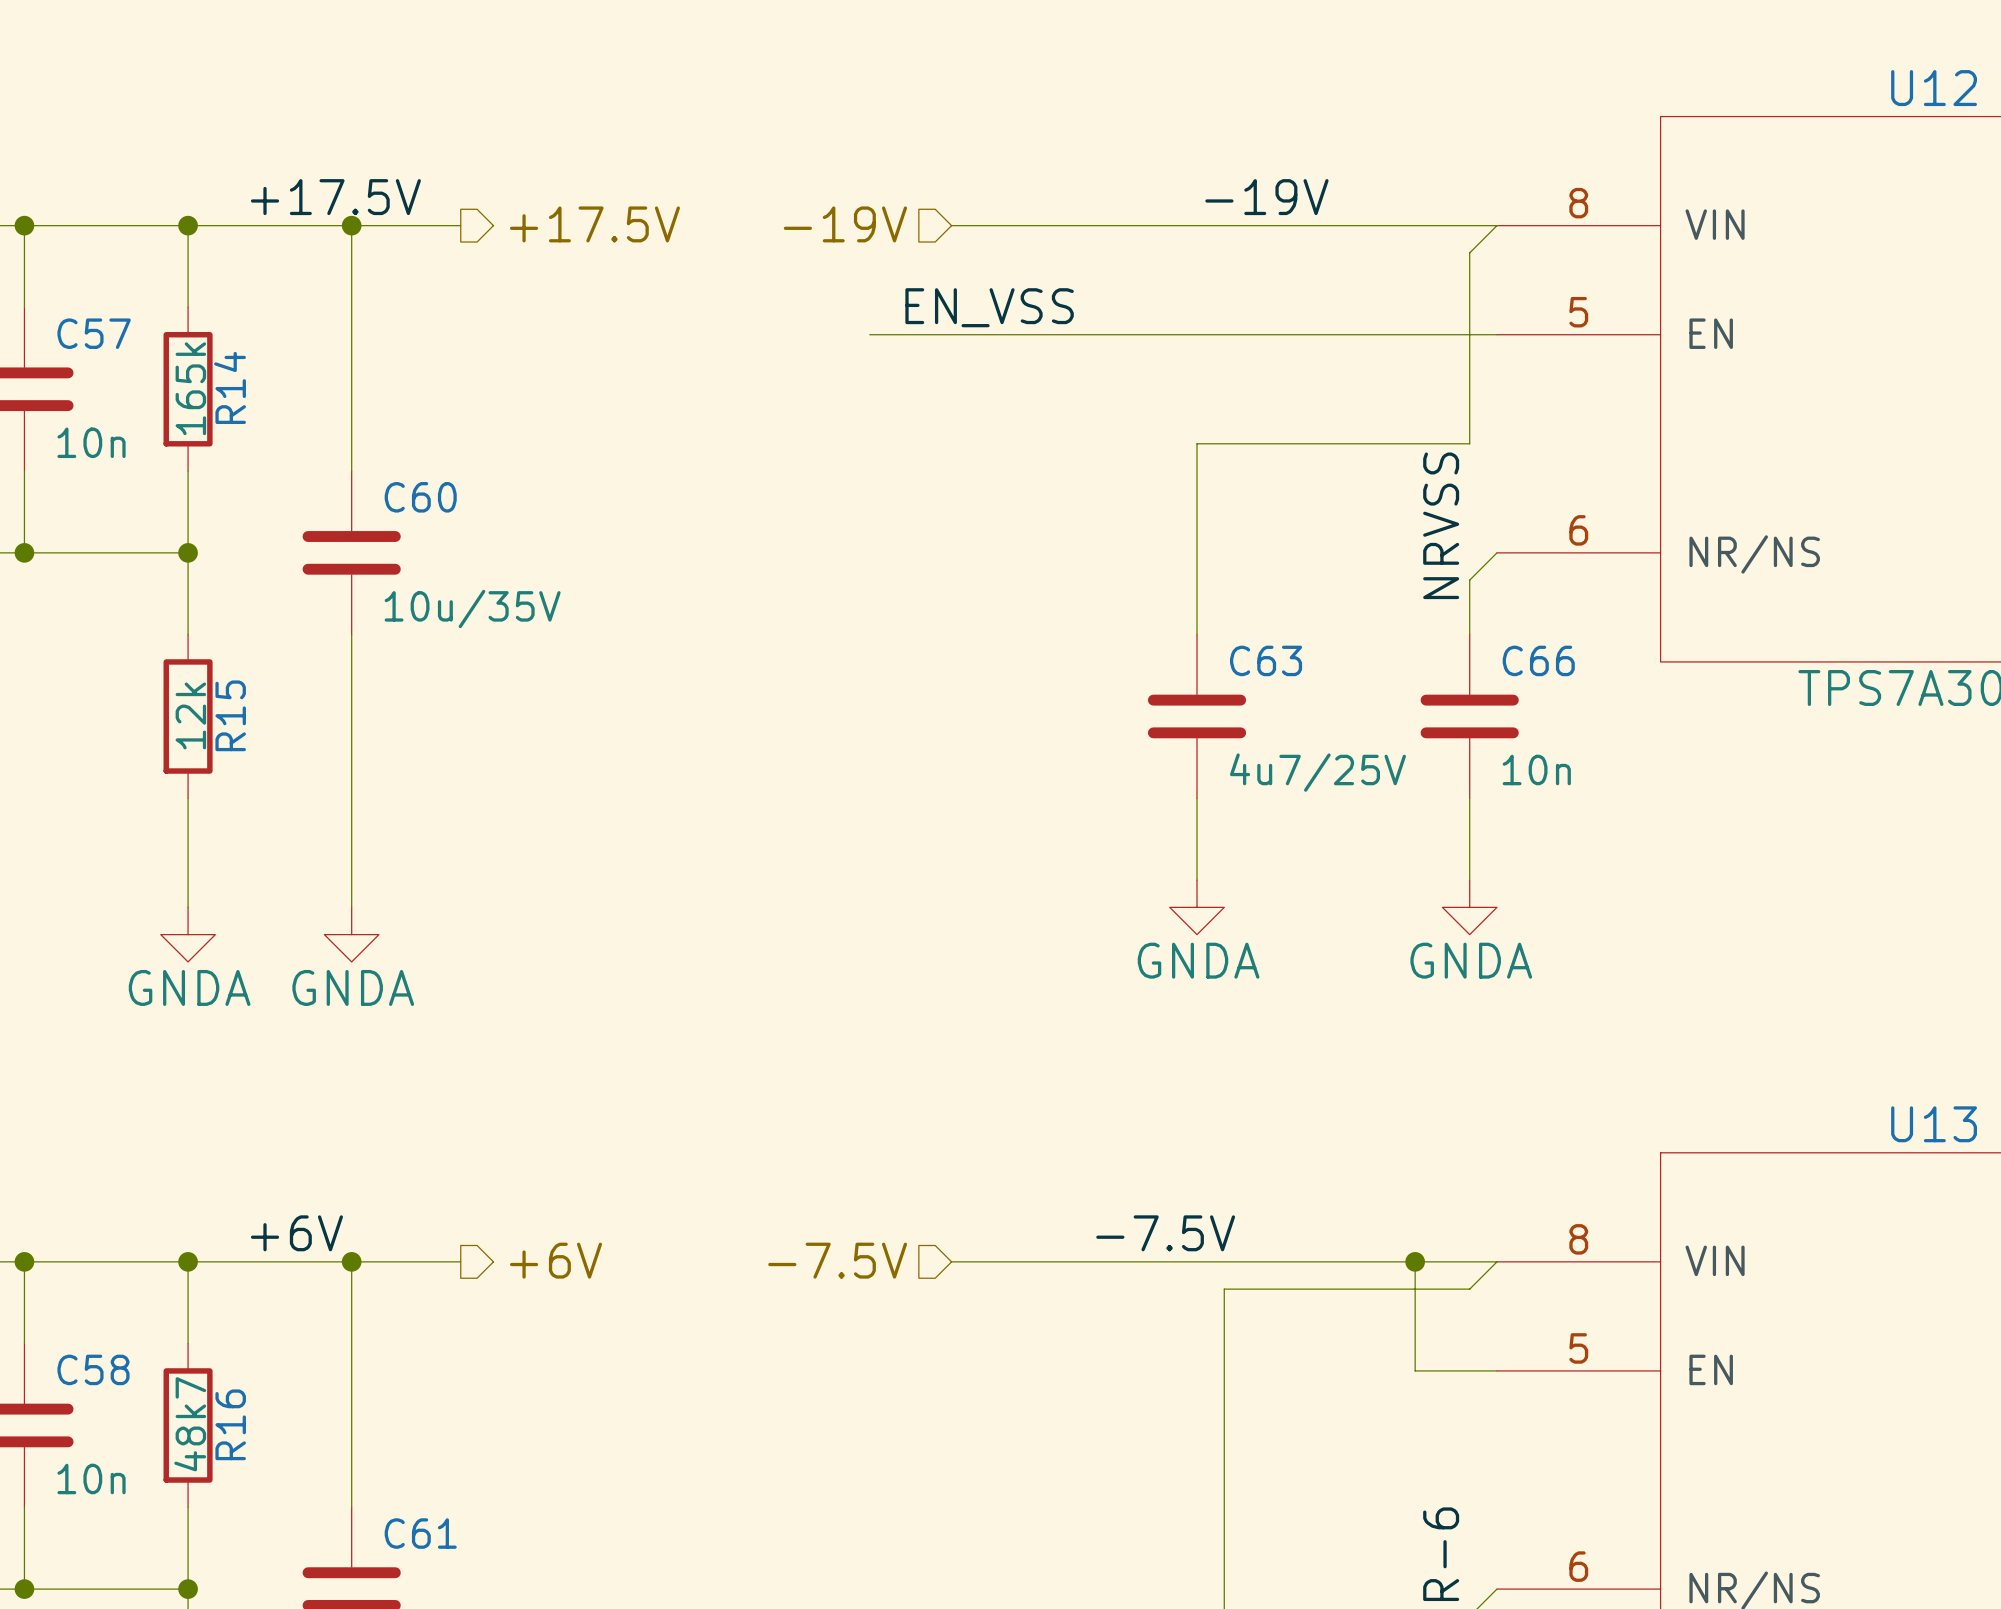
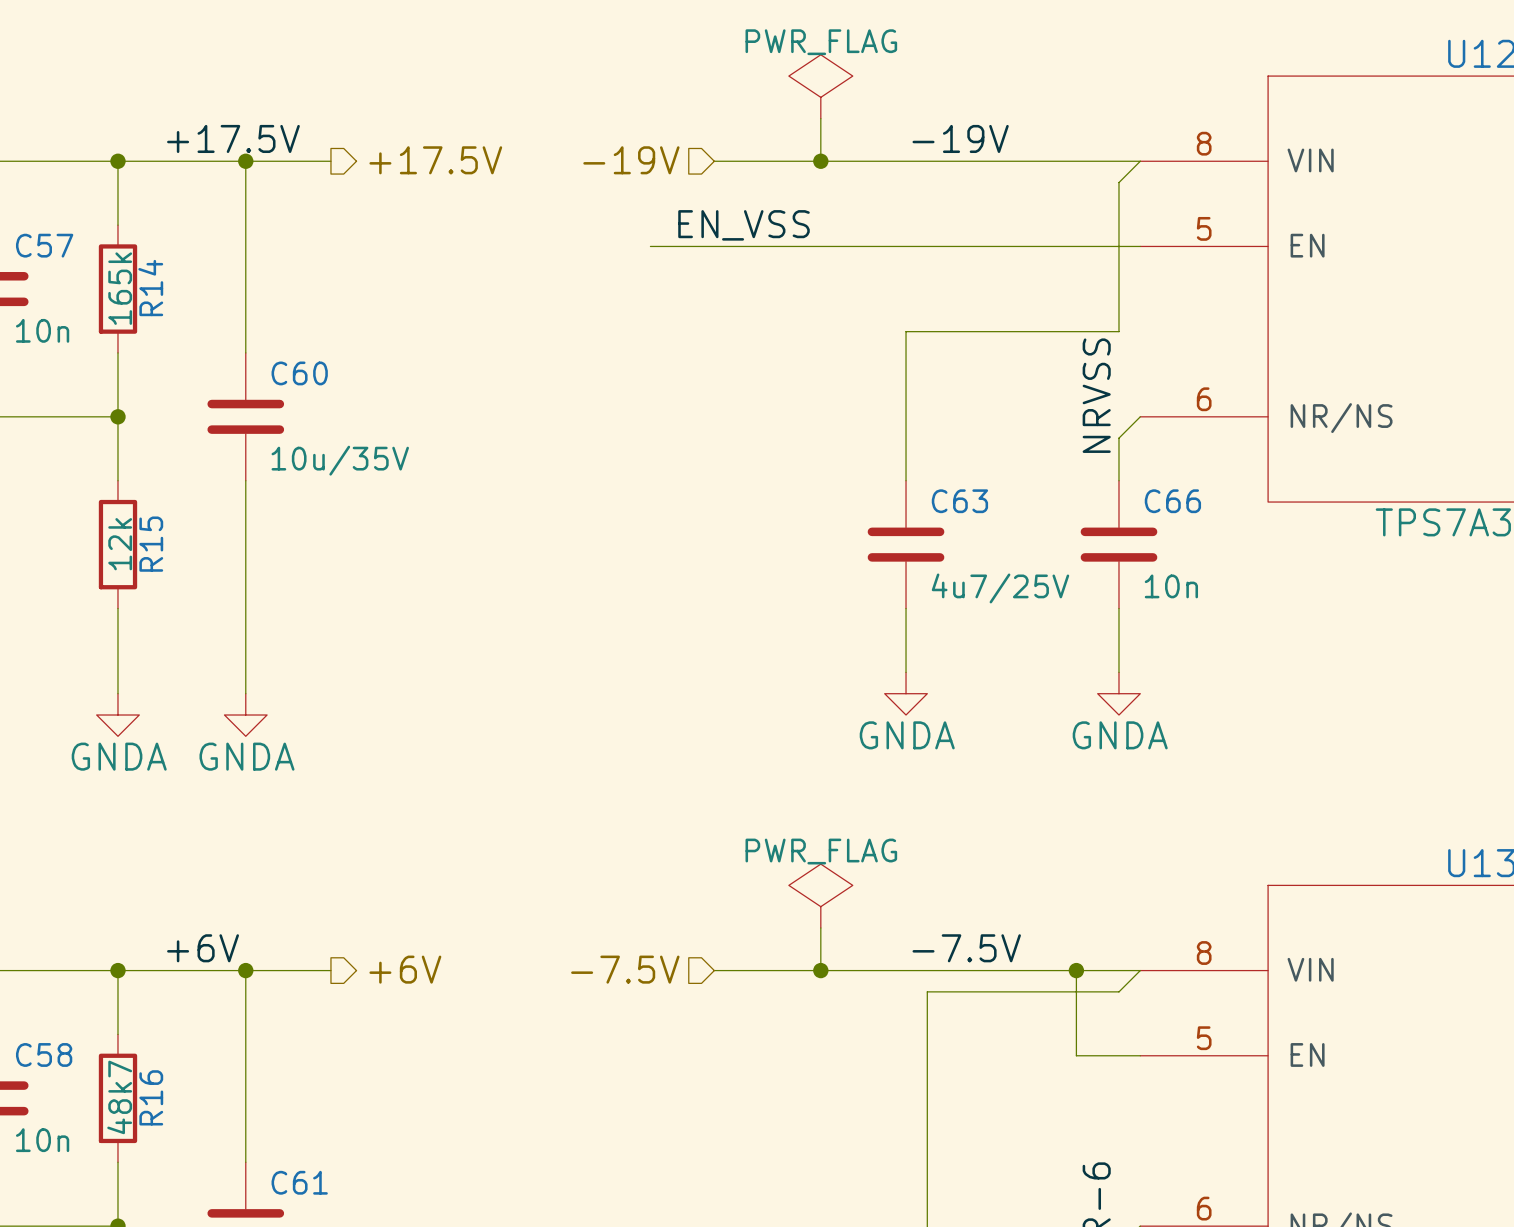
power symbol: none -> PWR_FLAG (820, 86)
wire: none -> (820, 118) (820, 161)
junction: none -> (820, 161)
power symbol: none -> PWR_FLAG (820, 896)
wire: none -> (820, 927) (820, 970)
label position: -7.5V (1165, 1233) -> -7.5V (966, 948)
junction: none -> (820, 970)

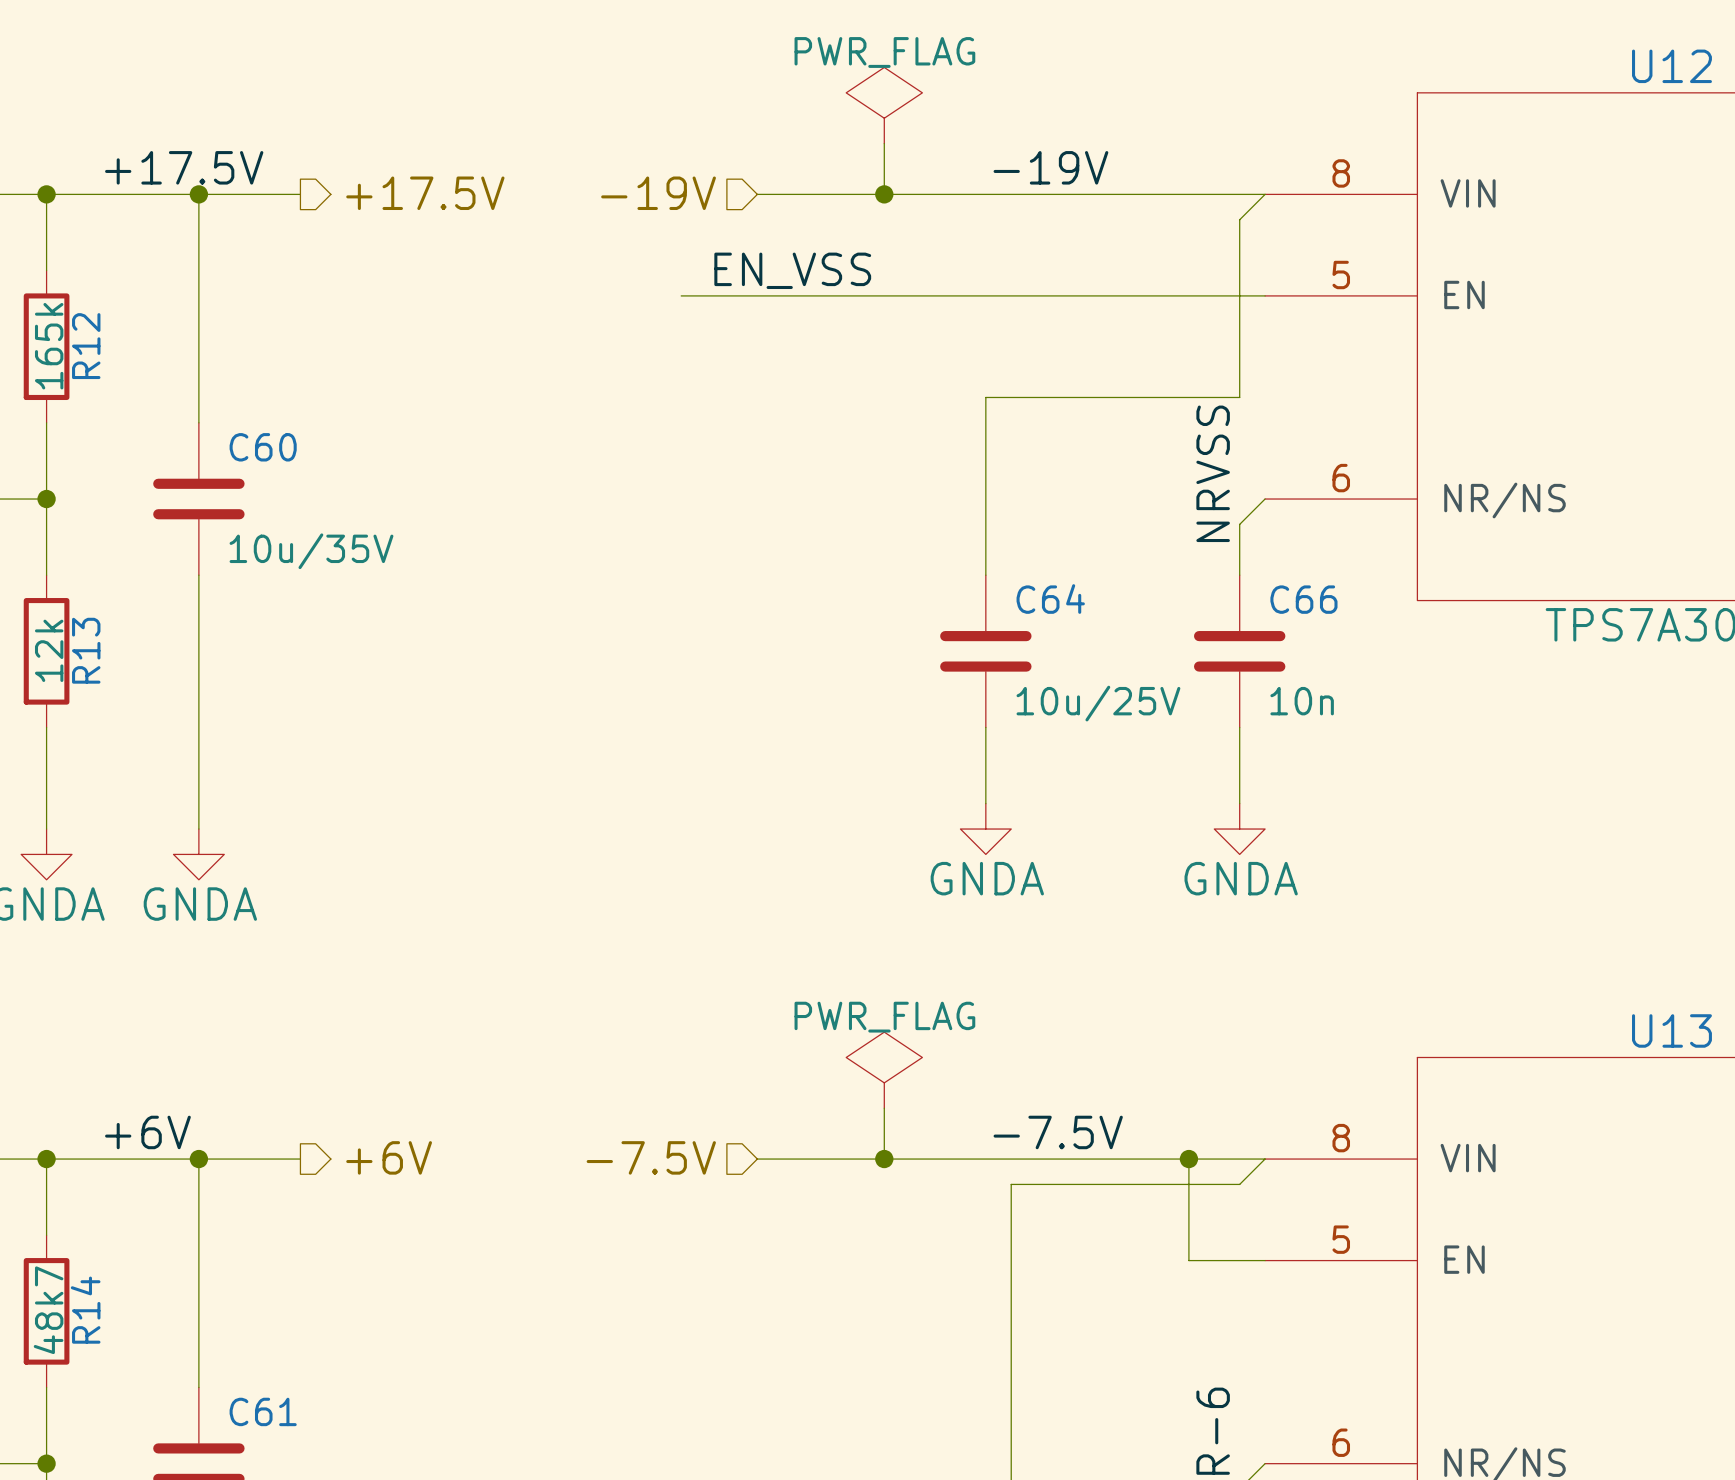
R14 name: R14 (150, 288) -> R12 (86, 346)
C63 name: C63 (959, 501) -> C64 (1050, 599)
R15 name: R15 (151, 544) -> R13 (86, 650)
C63 value: 4u7/25V (1000, 588) -> 10u/25V (1098, 703)
R16 name: R16 (151, 1097) -> R14 (85, 1310)

